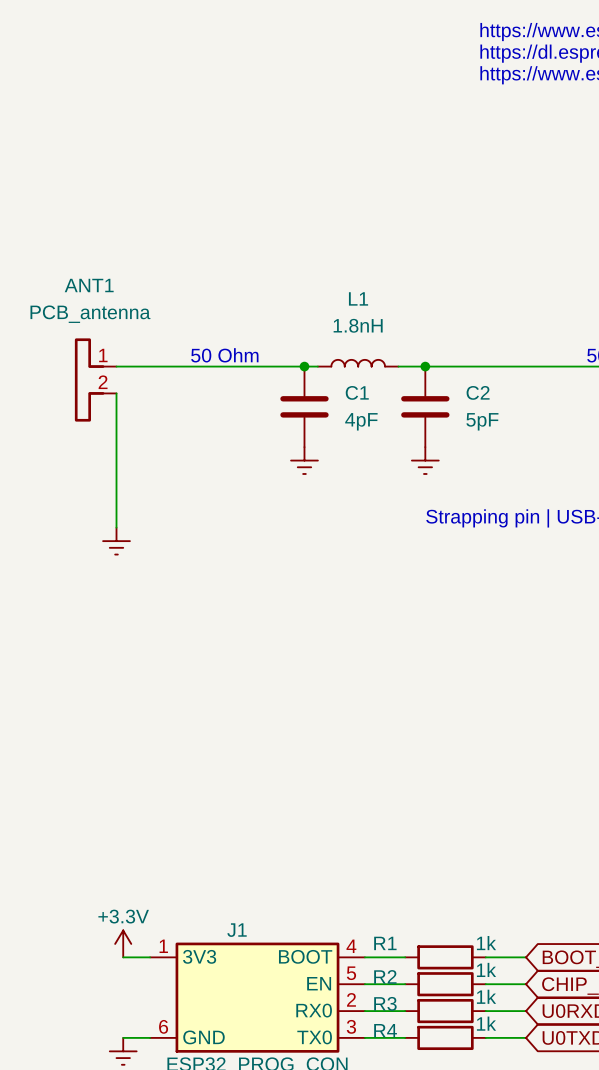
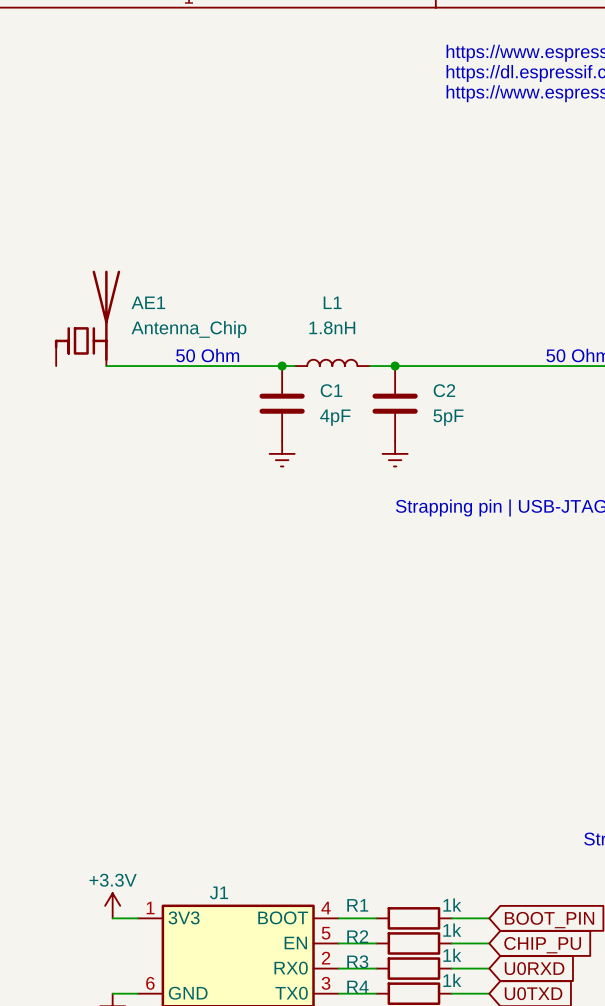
AE1: none -> Antenna_Chip (87, 318)
ANT1: PCB_antenna (95, 380) -> none
wire: (116, 393) (116, 527) -> none
power symbol: (116, 541) -> none

